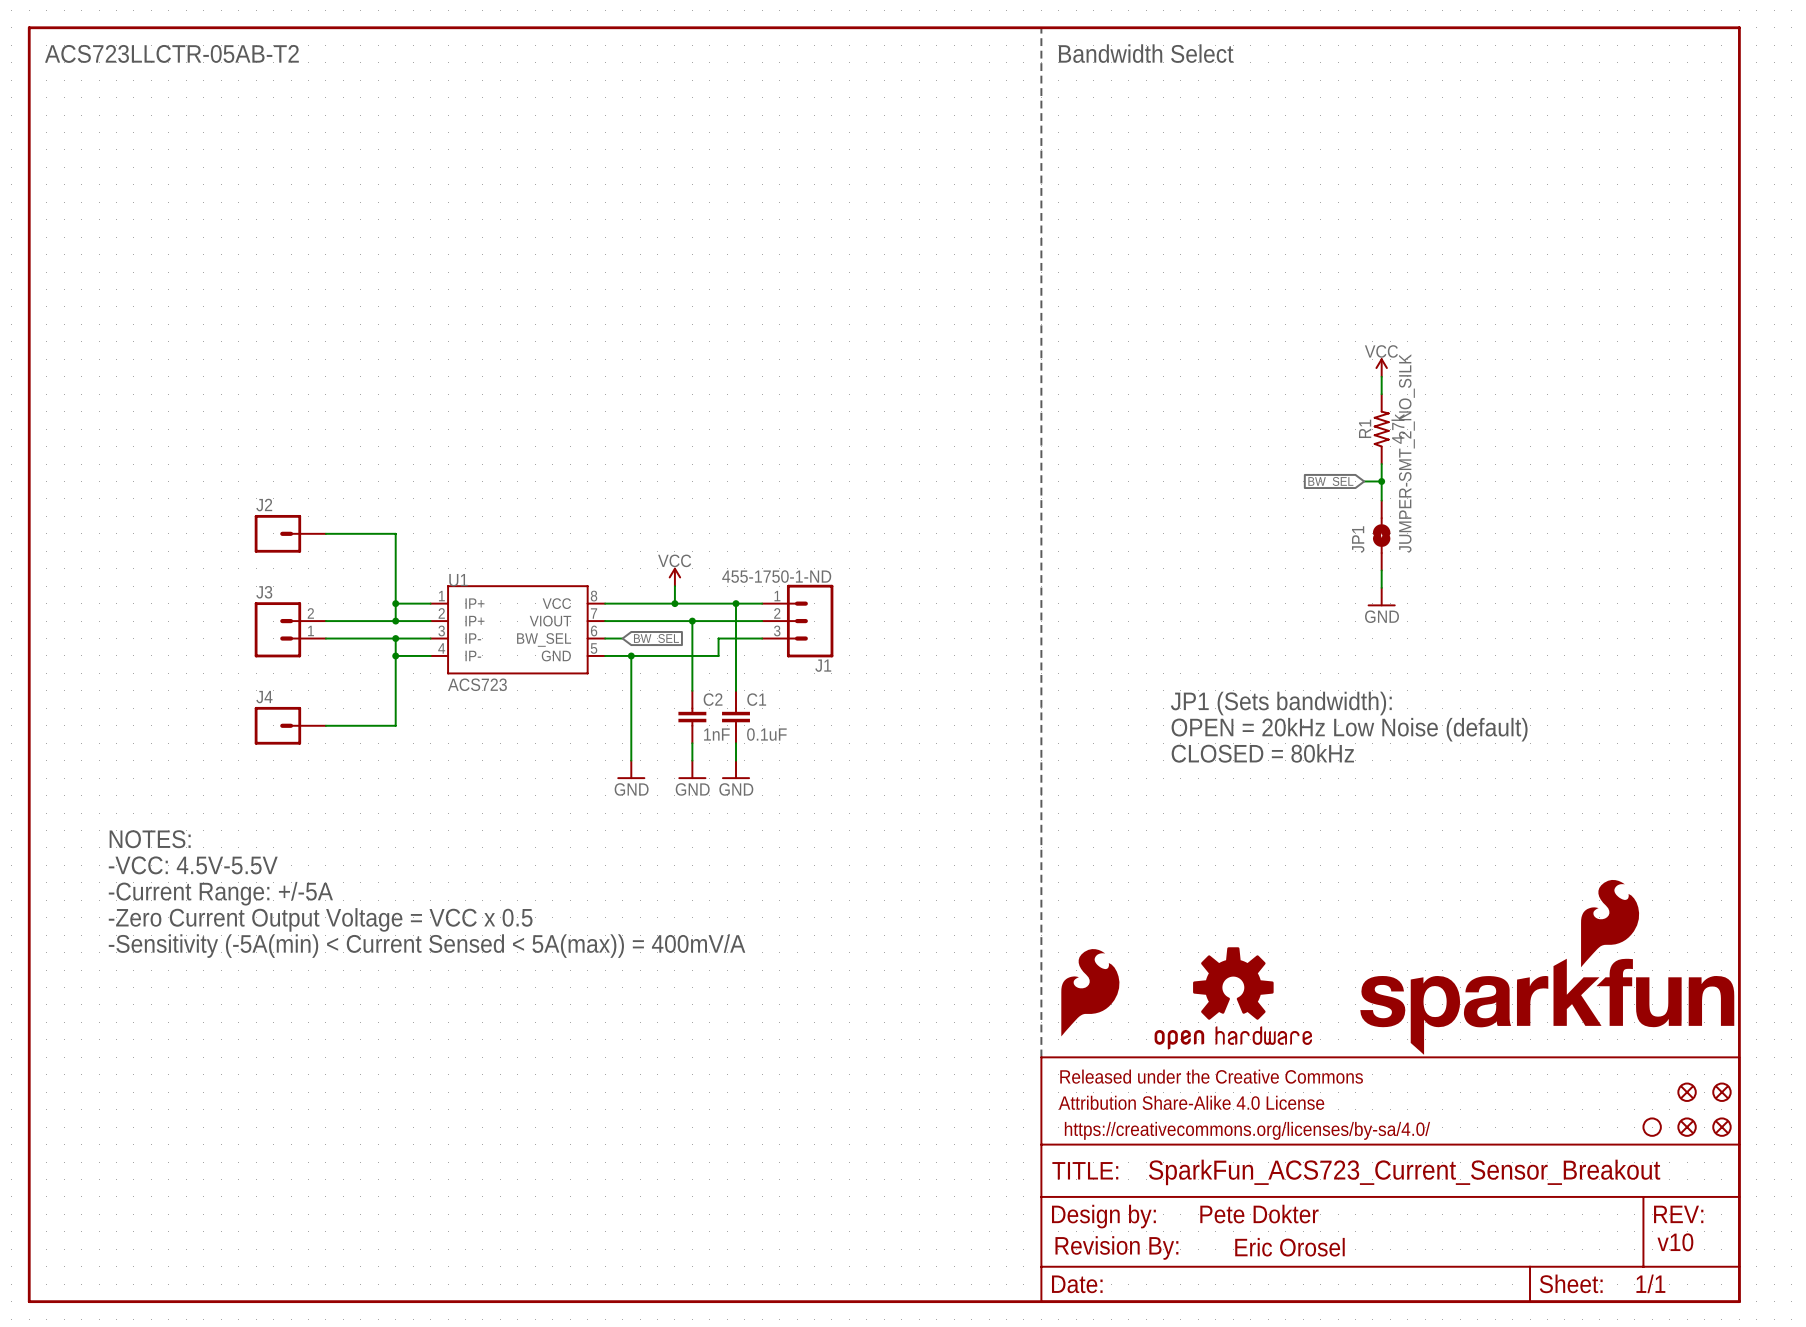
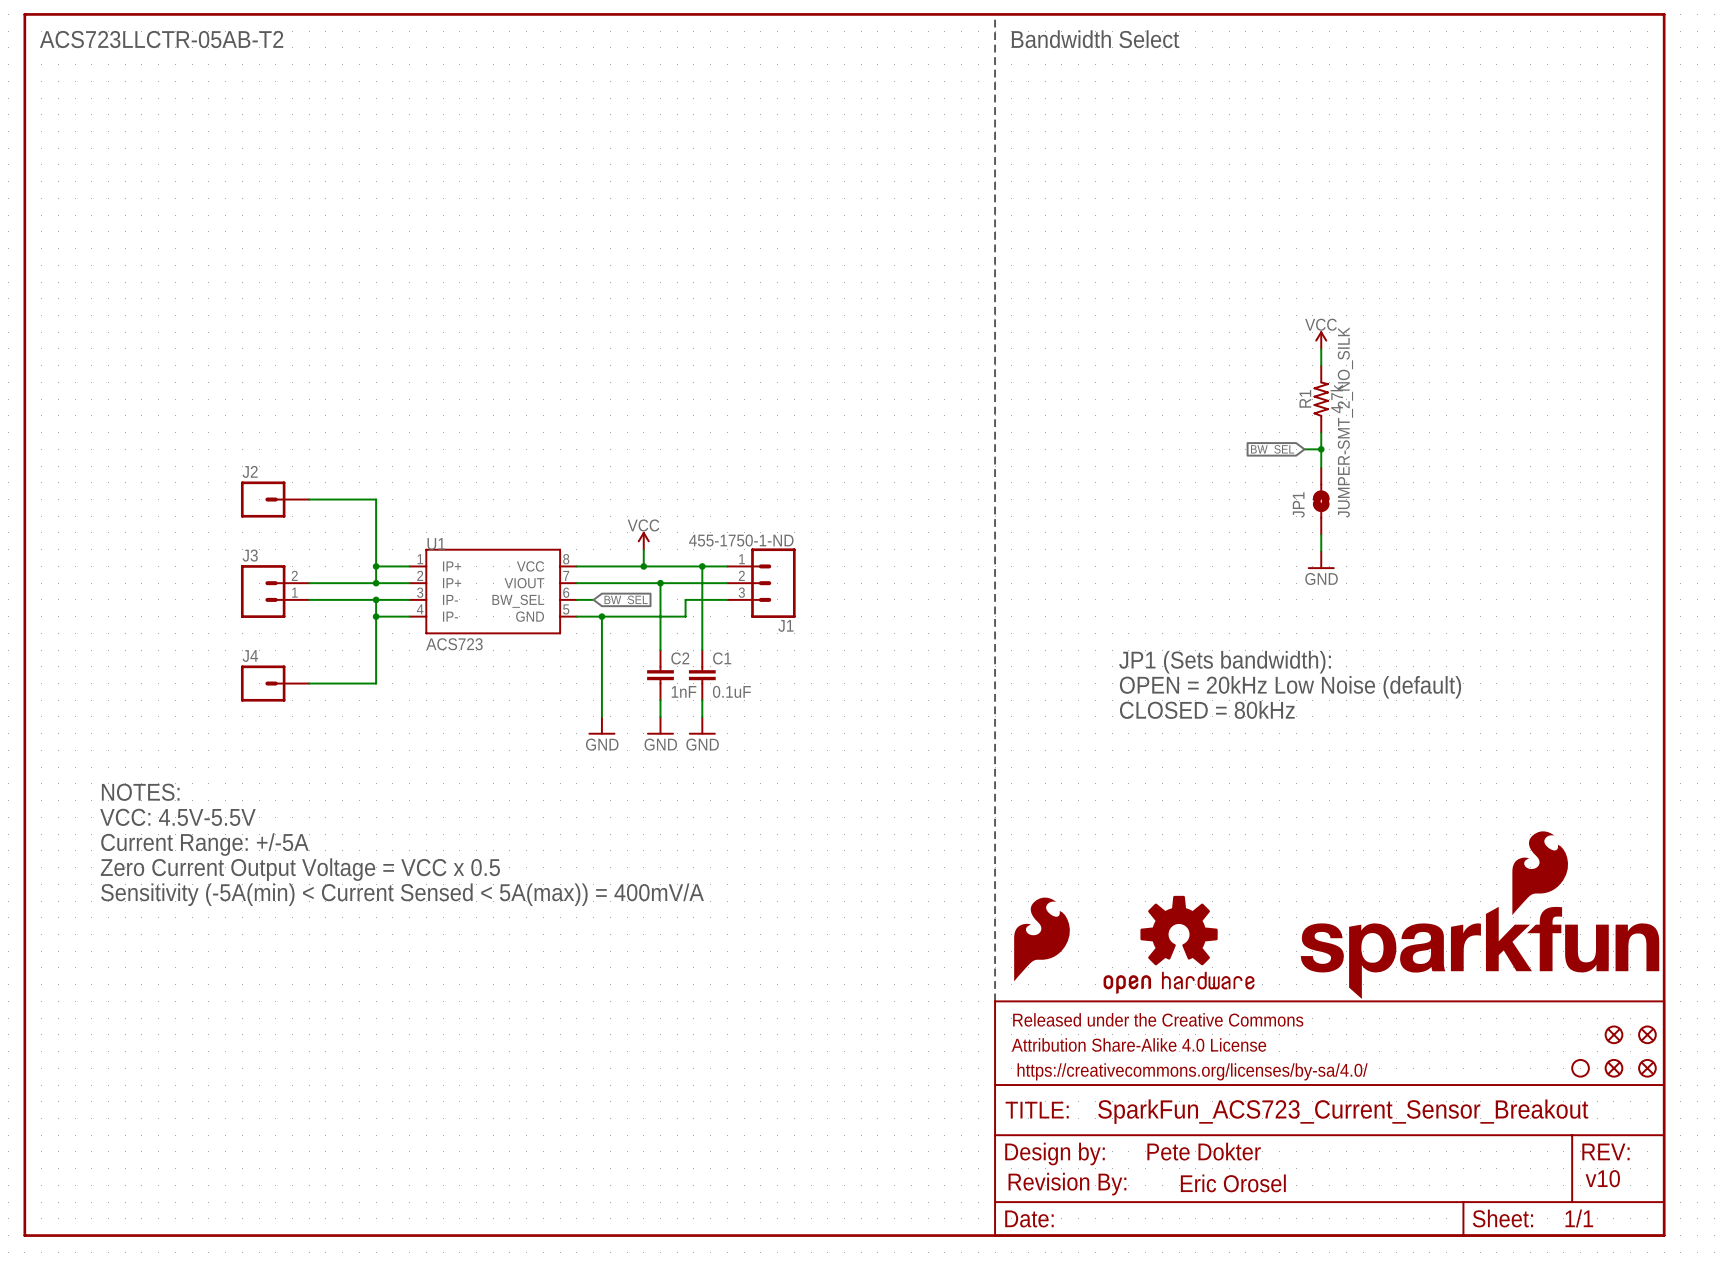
text: -VCC: 4.5V-5.5V (193, 865) -> VCC: 4.5V-5.5V (177, 817)
text: -Current Range: +/-5A (220, 893) -> Current Range: +/-5A (204, 844)
text: -Zero Current Output Voltage = VCC x 0.5 (320, 919) -> Zero Current Output Voltage = VCC x 0.5 (300, 869)
text: -Sensitivity (-5A(min) < Current Sensed < 5A(max)) = 400mV/A (427, 946) -> Sensitivity (-5A(min) < Current Sensed < 5A(max)) = 400mV/A (402, 894)

